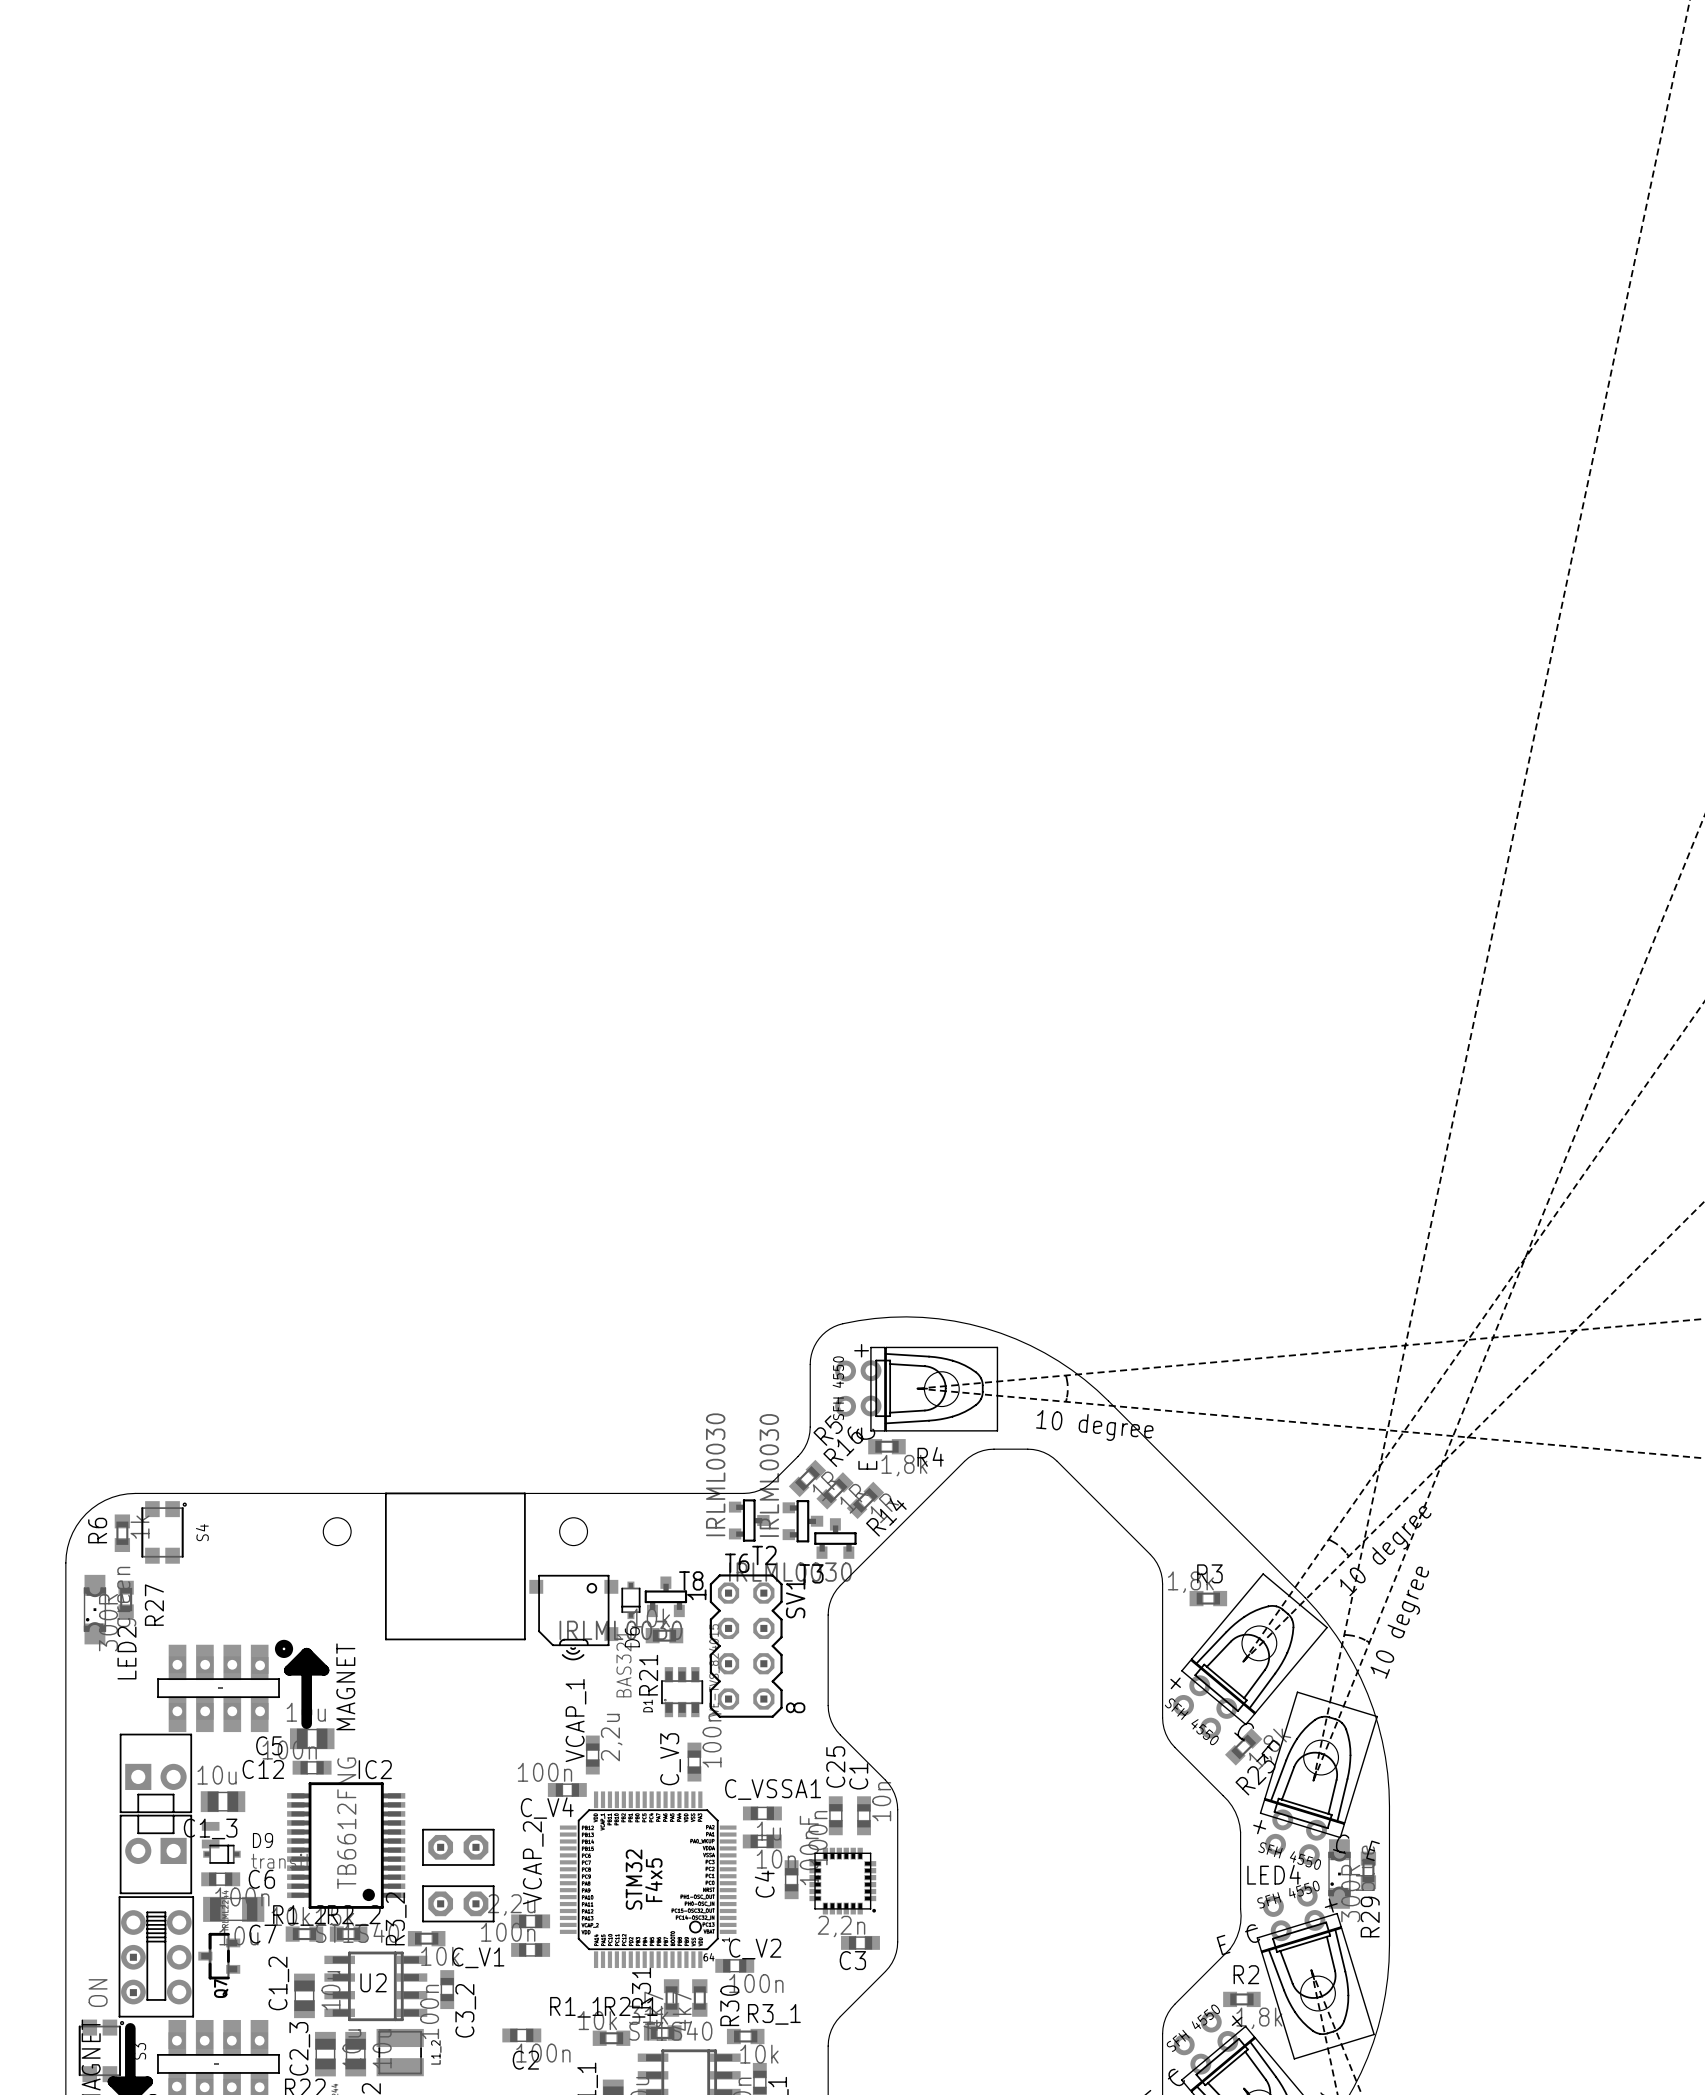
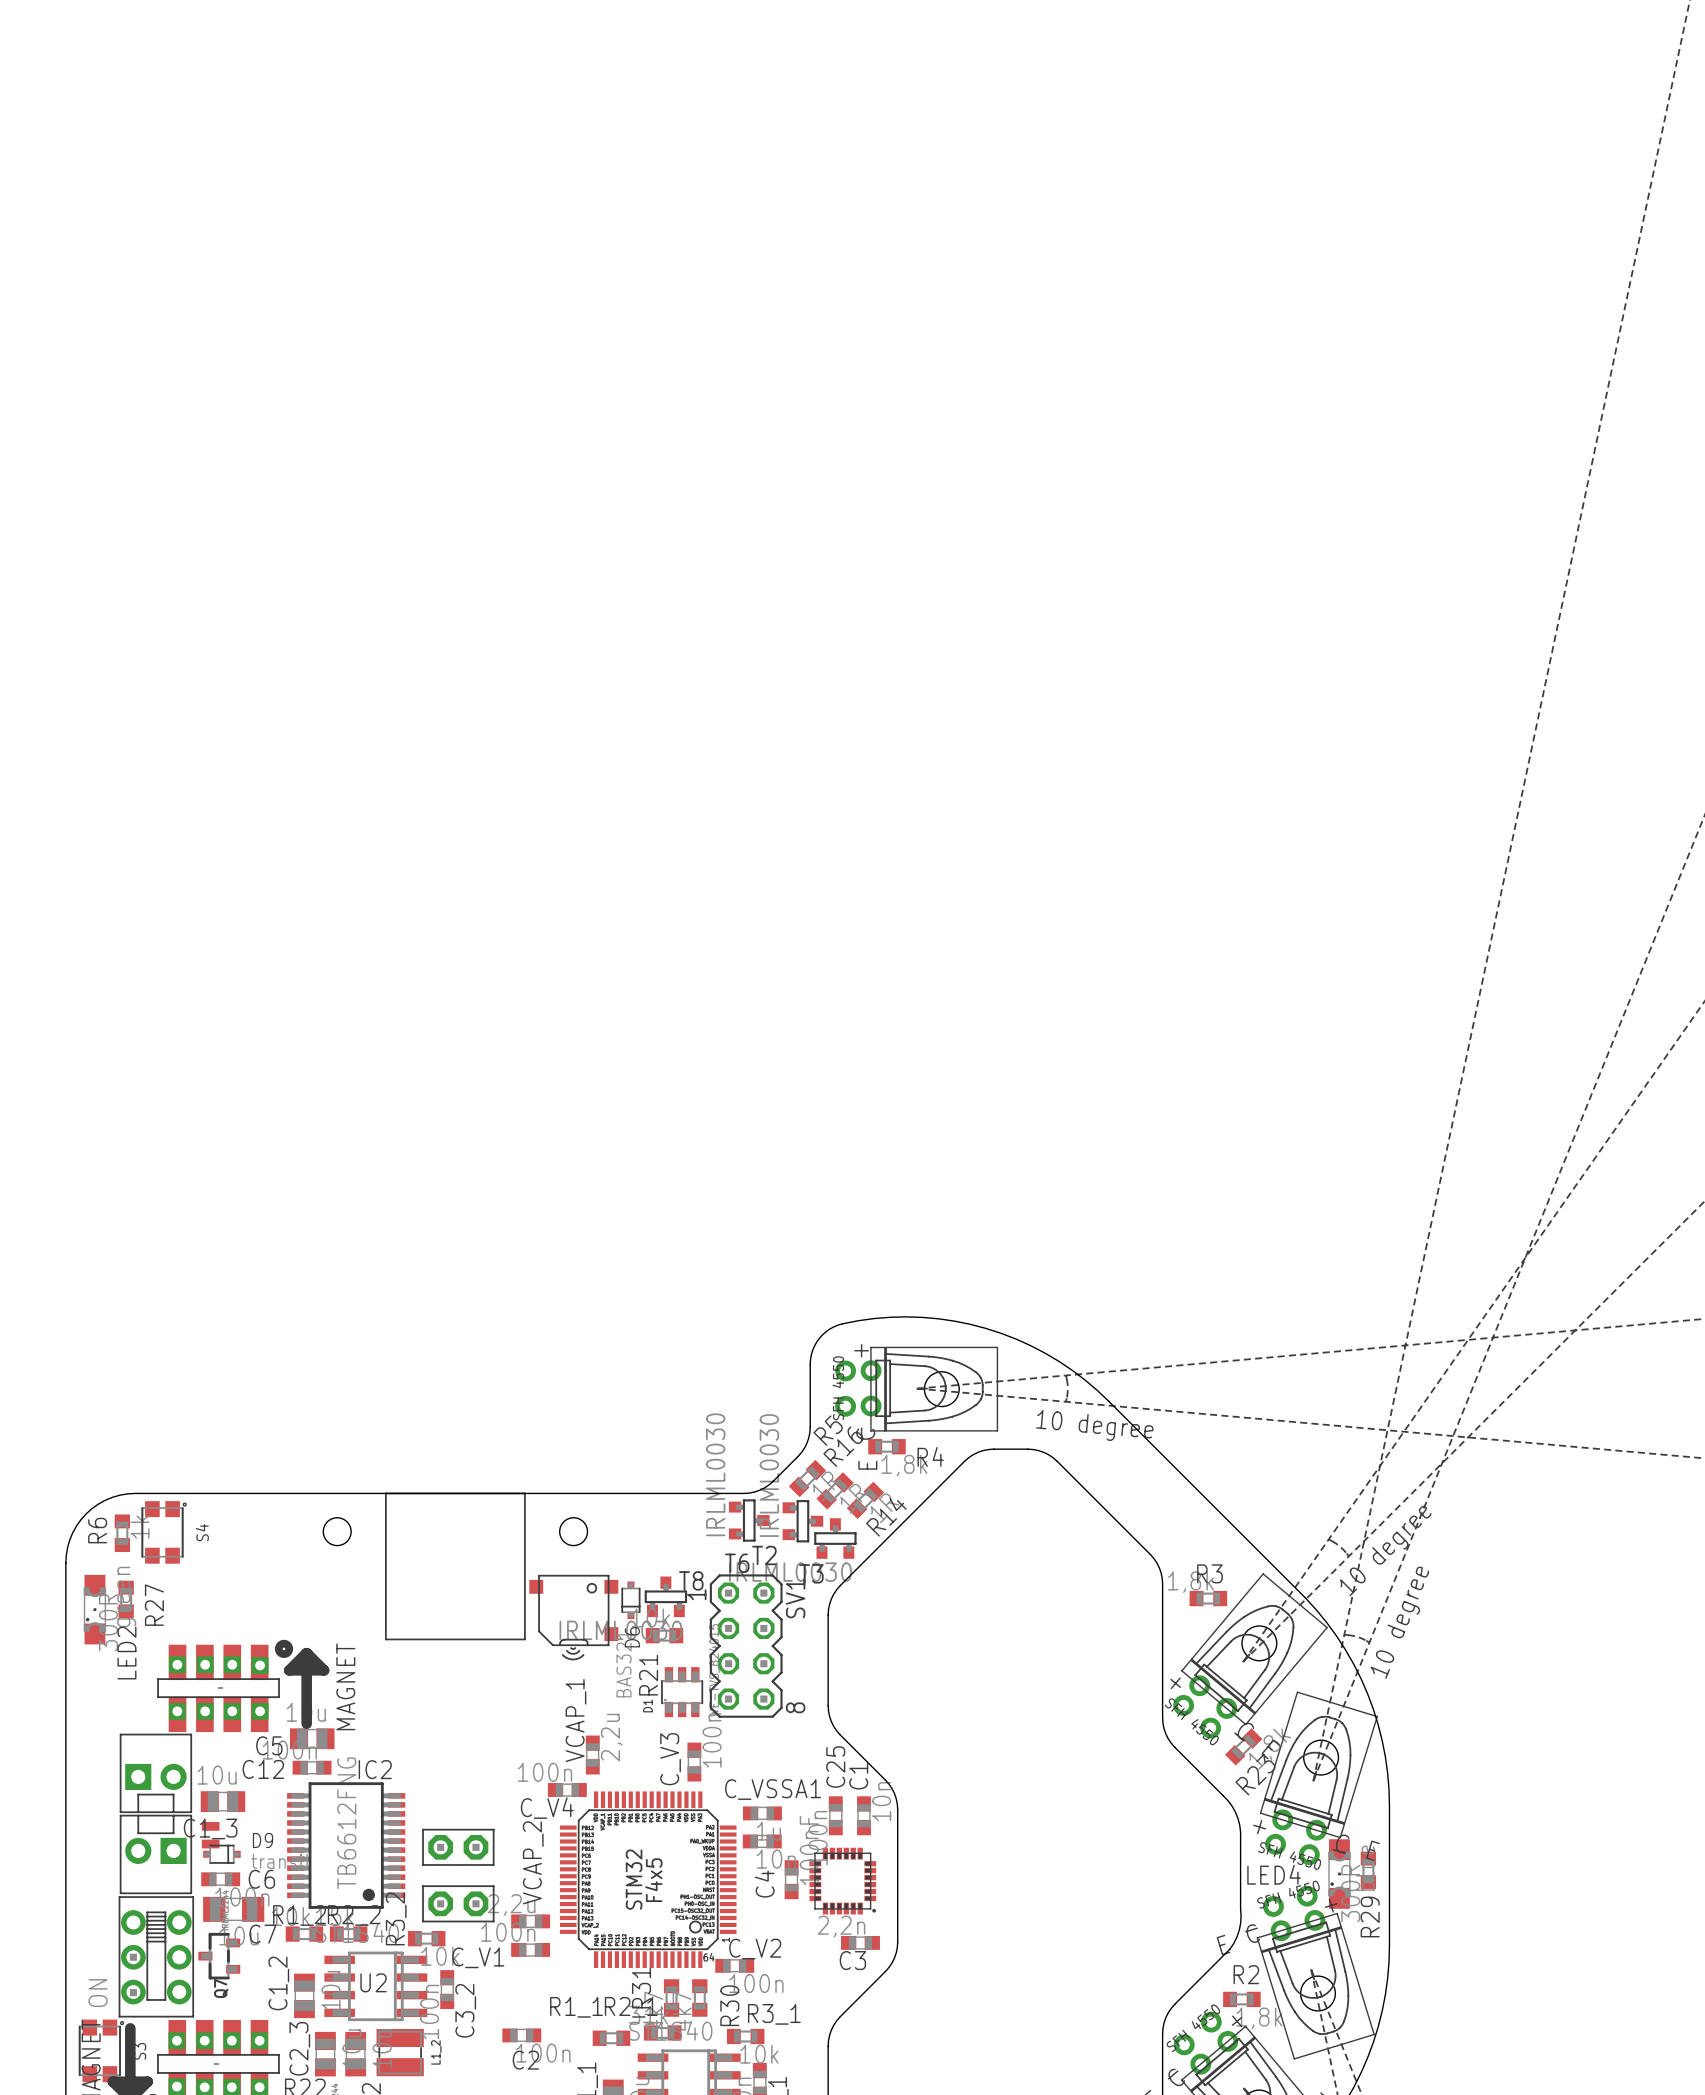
R1_1 value: 10k (597, 2020) -> none

